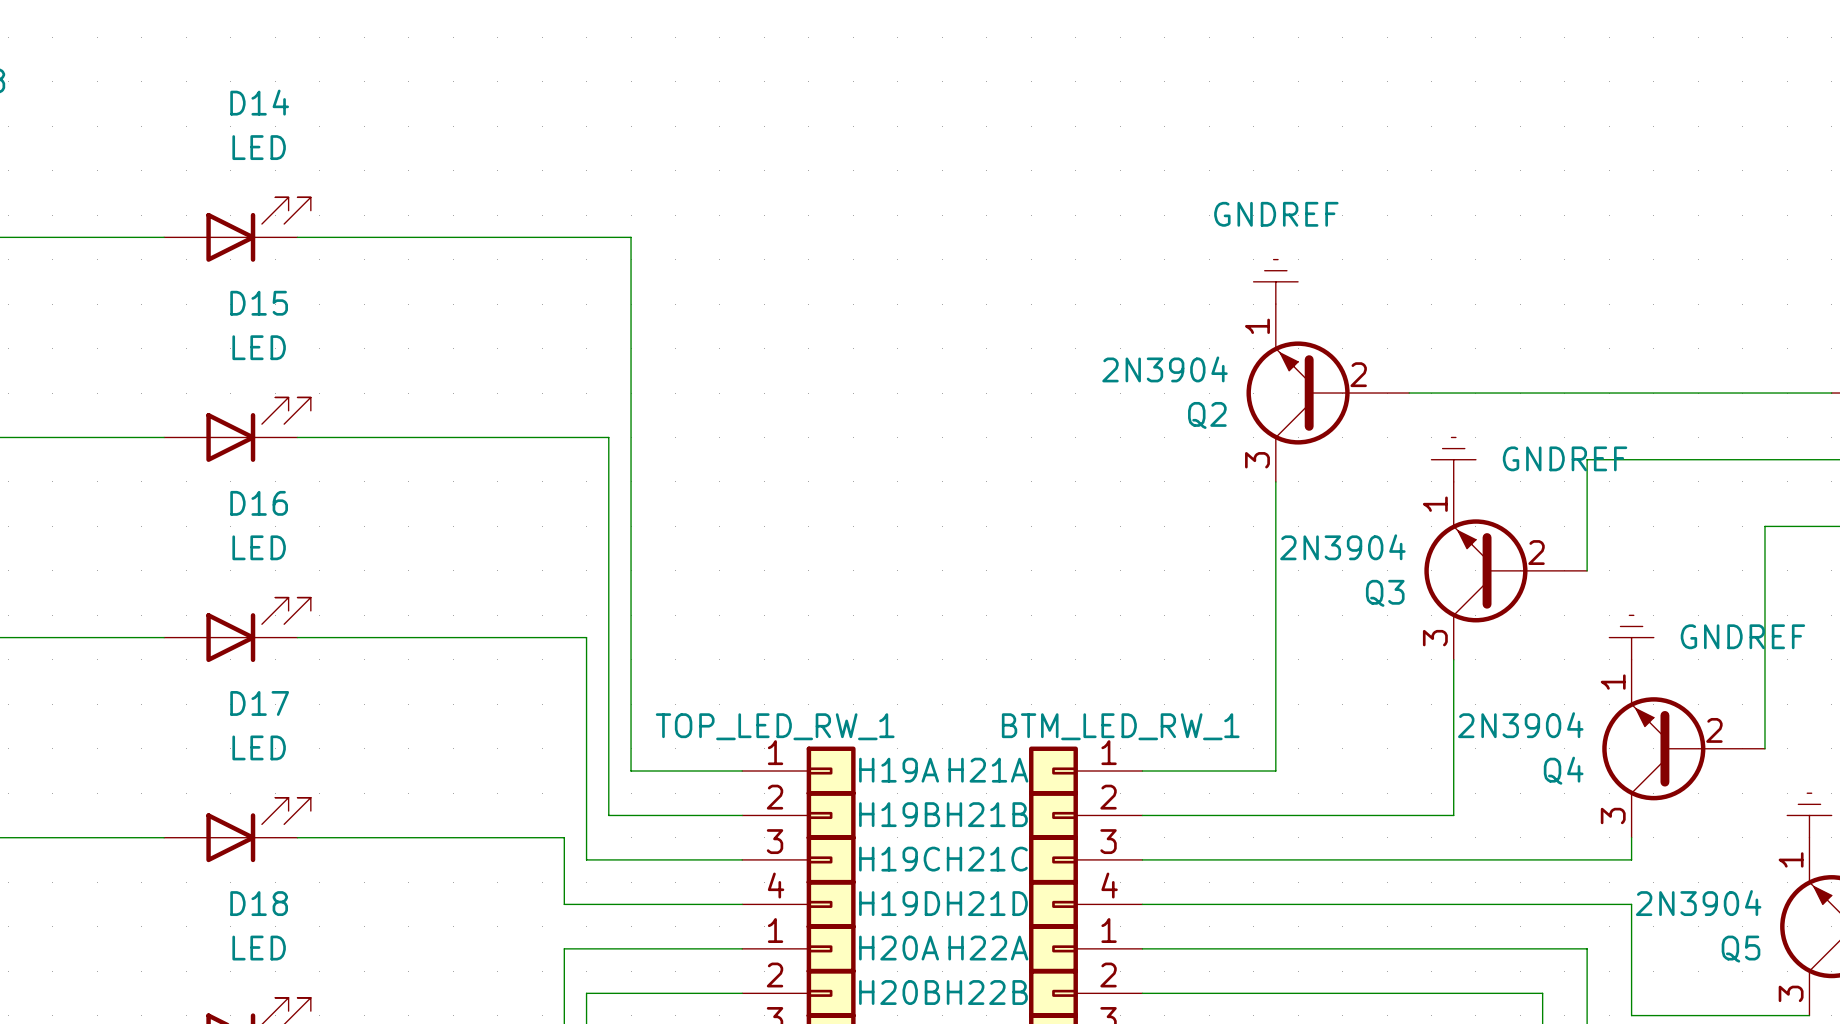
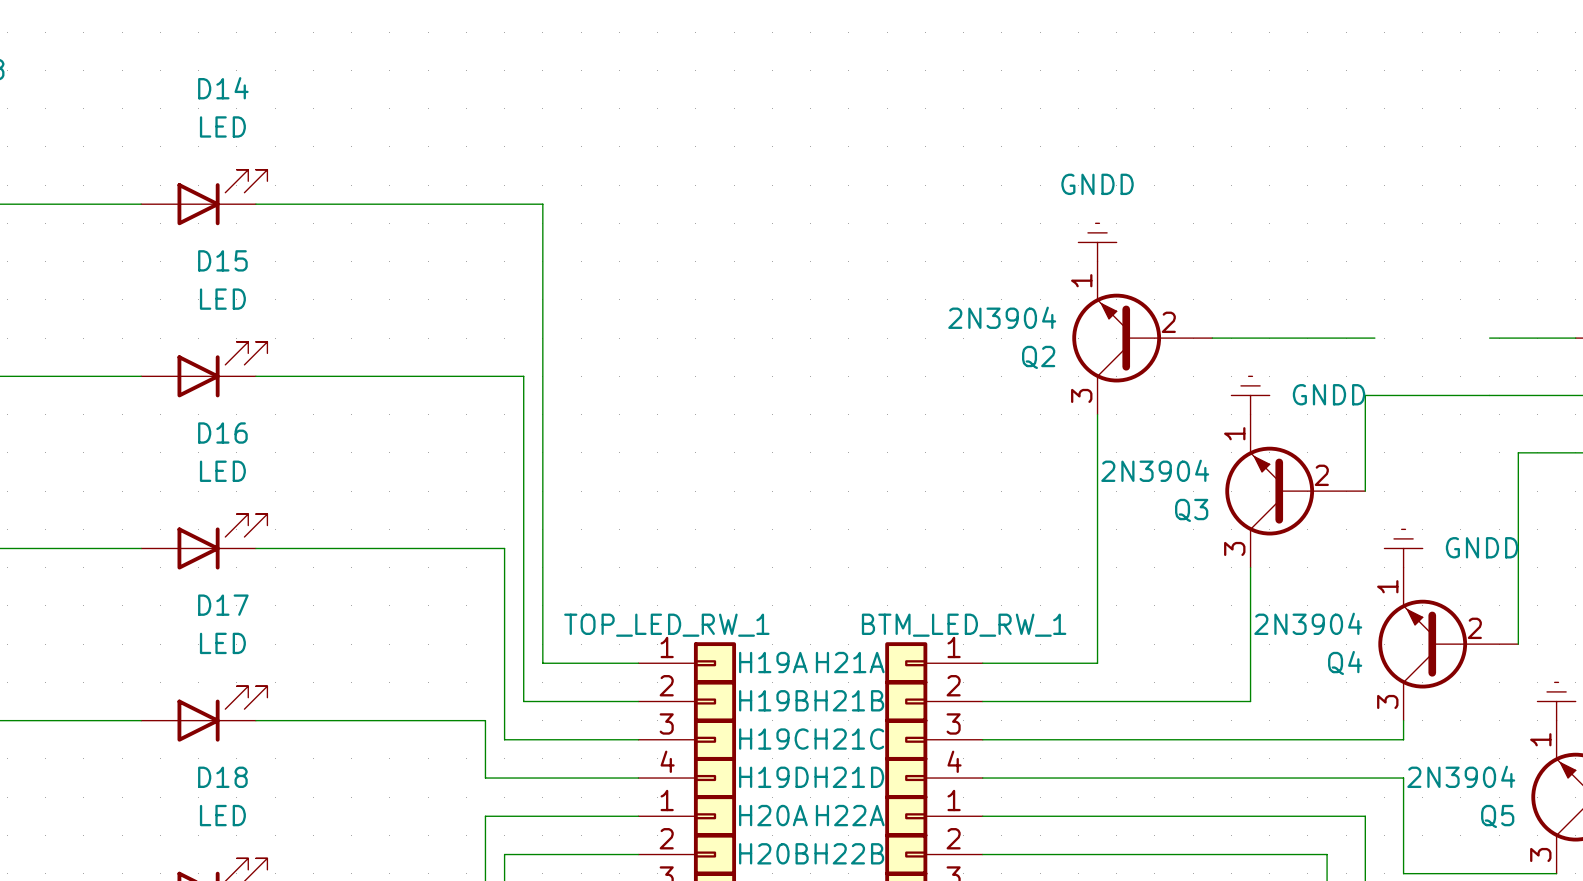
power symbol: GNDREF (1275, 281) -> GNDD (1097, 242)
wire: (1598, 393) (1731, 393) -> none
power symbol: GNDREF (1453, 459) -> GNDD (1250, 395)
power symbol: GNDREF (1631, 637) -> GNDD (1403, 548)

